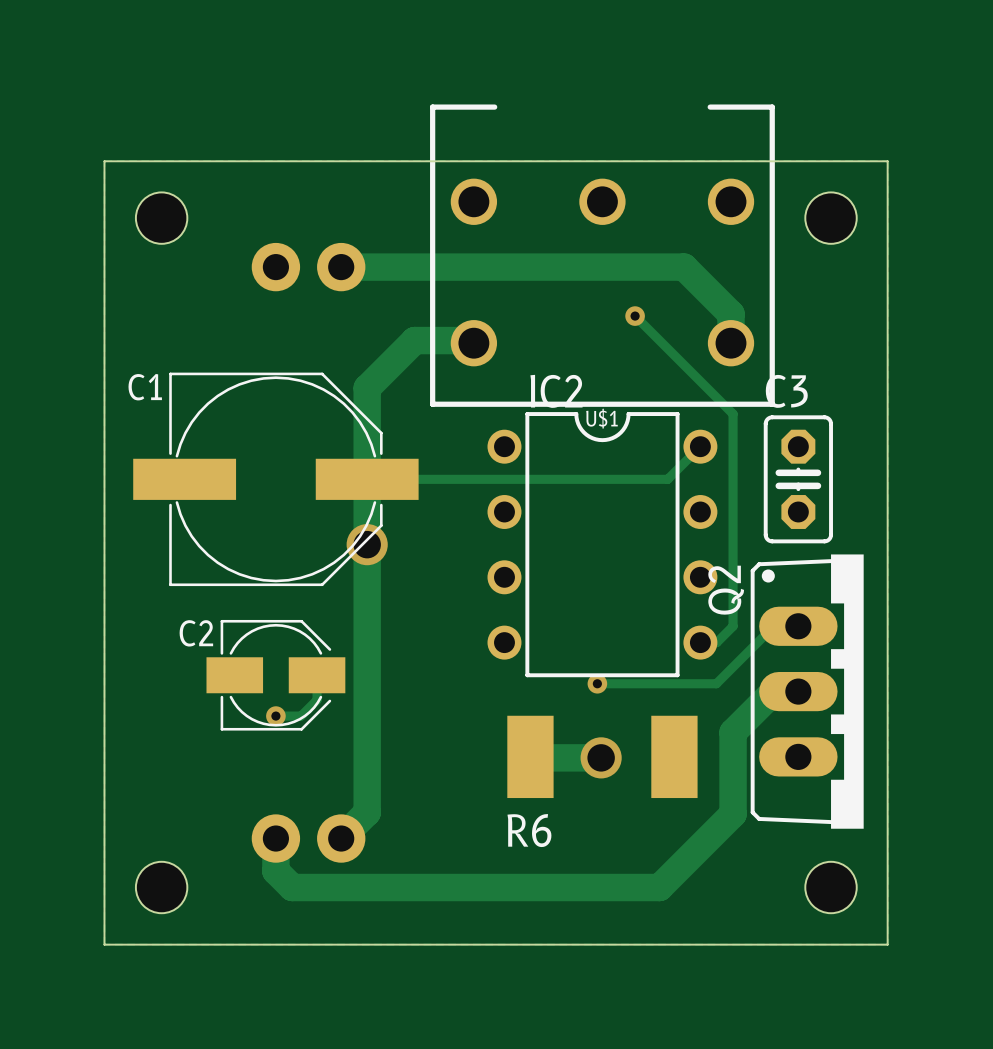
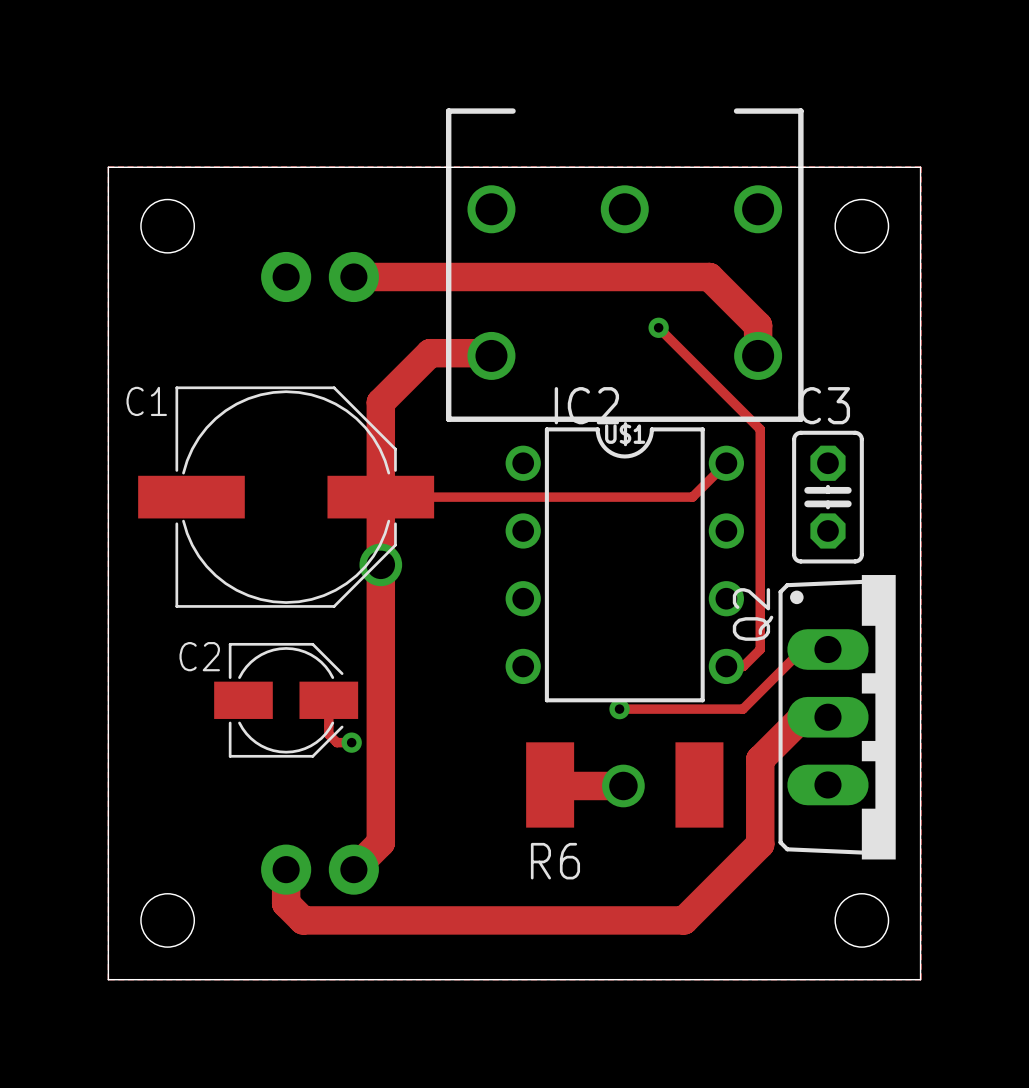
track: (317, 700) (301, 716) (275, 716) -> (328, 726) (328, 734) (336, 742) (351, 742)
via position: (275, 716) -> (351, 742)

